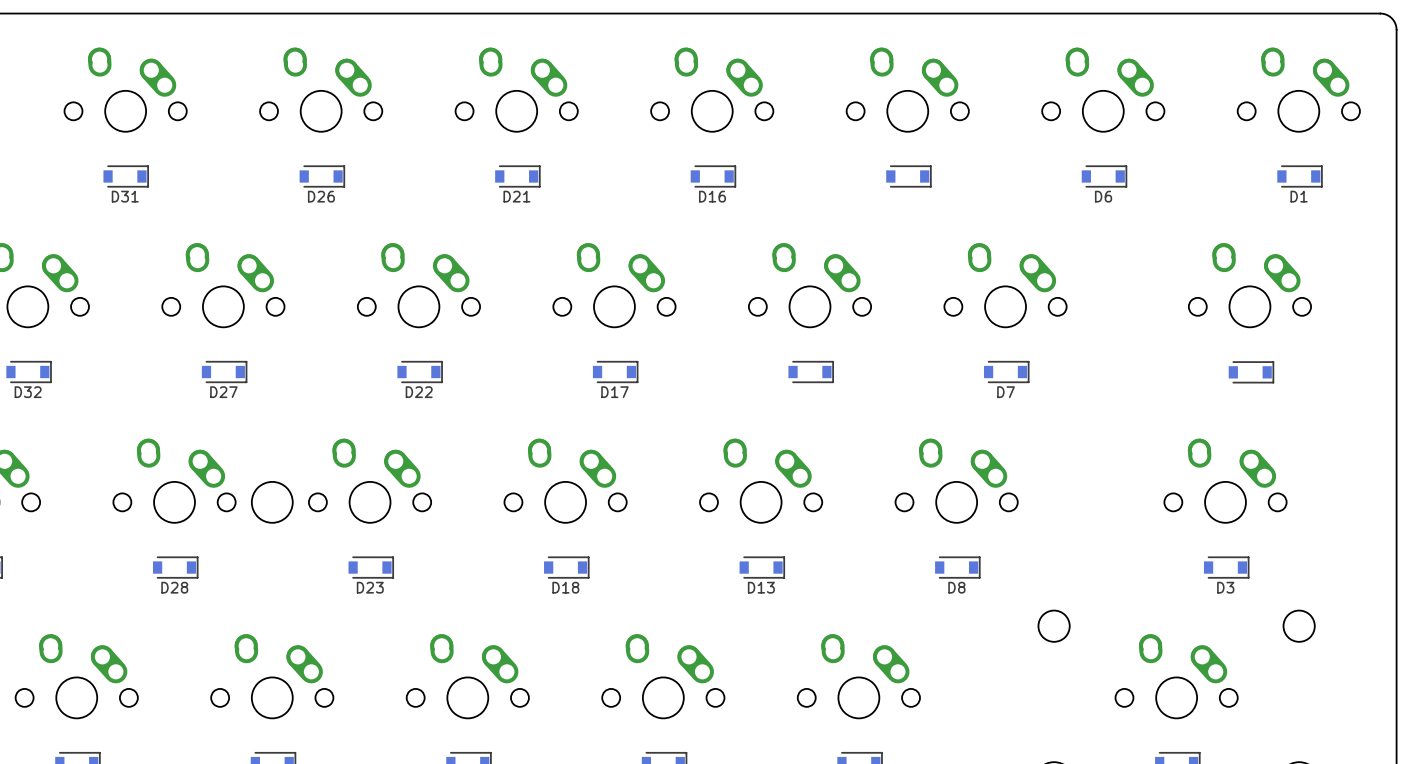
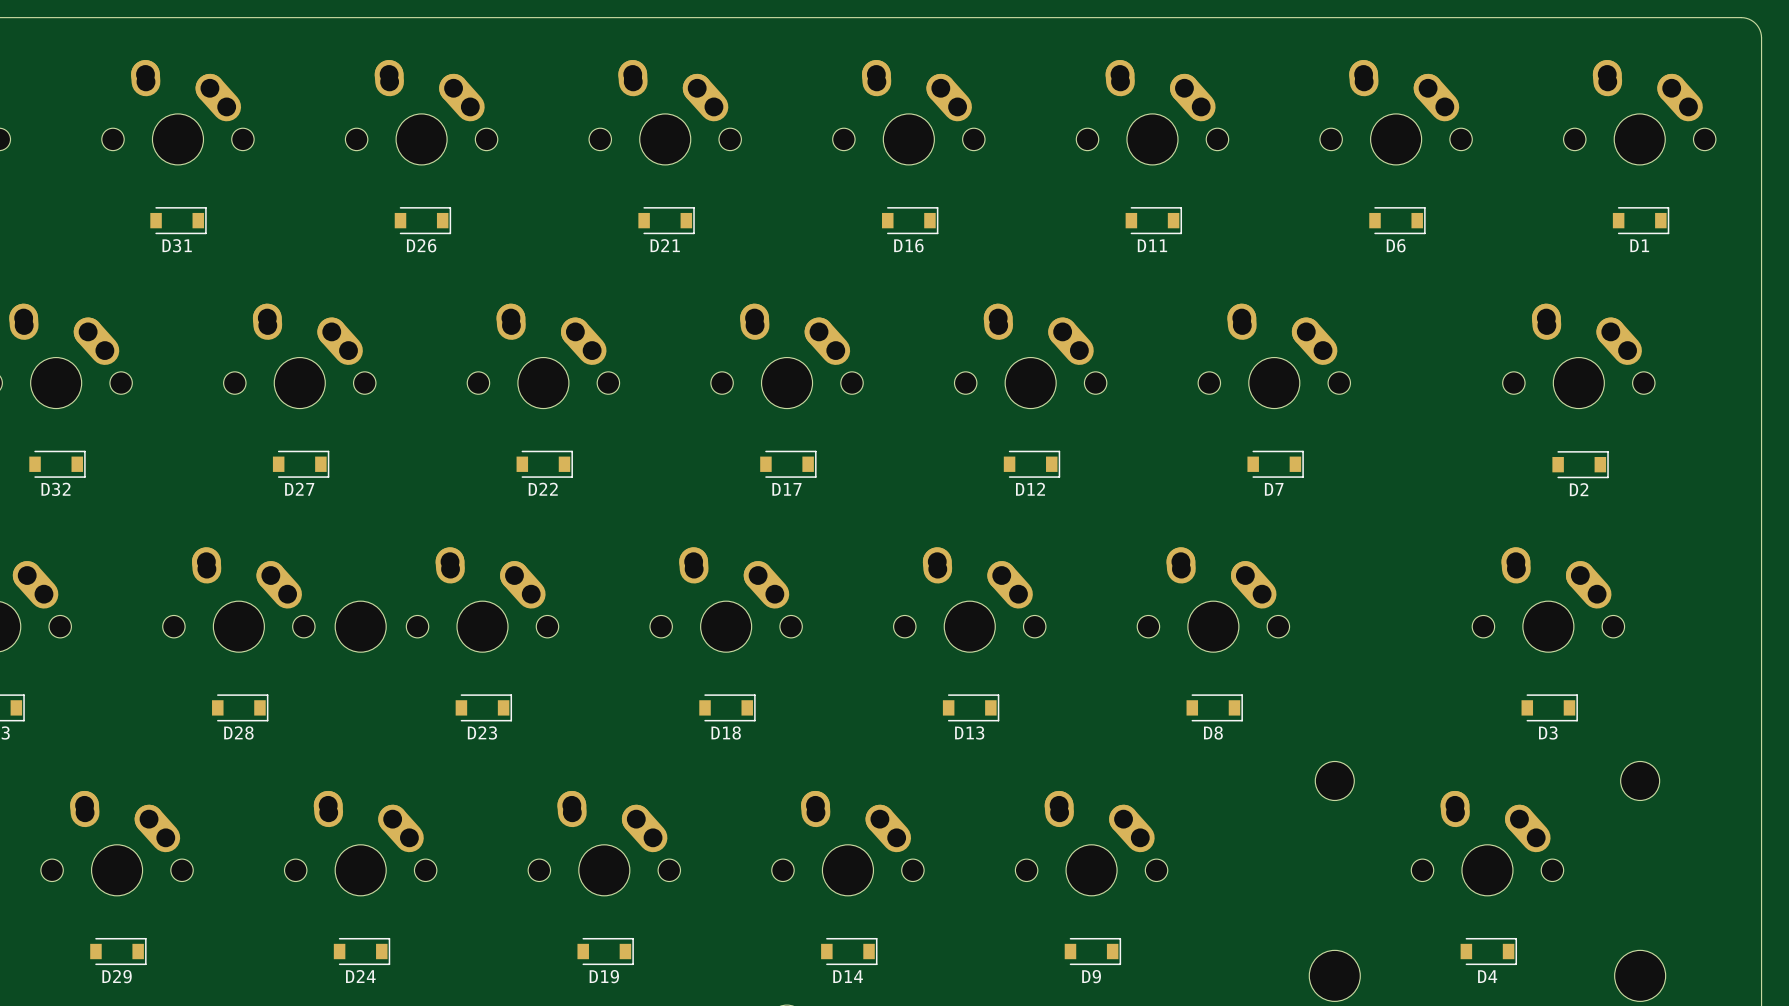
D11 name: none -> D11 (1152, 245)
D12 name: none -> D12 (1030, 489)
D2 name: none -> D2 (1579, 489)

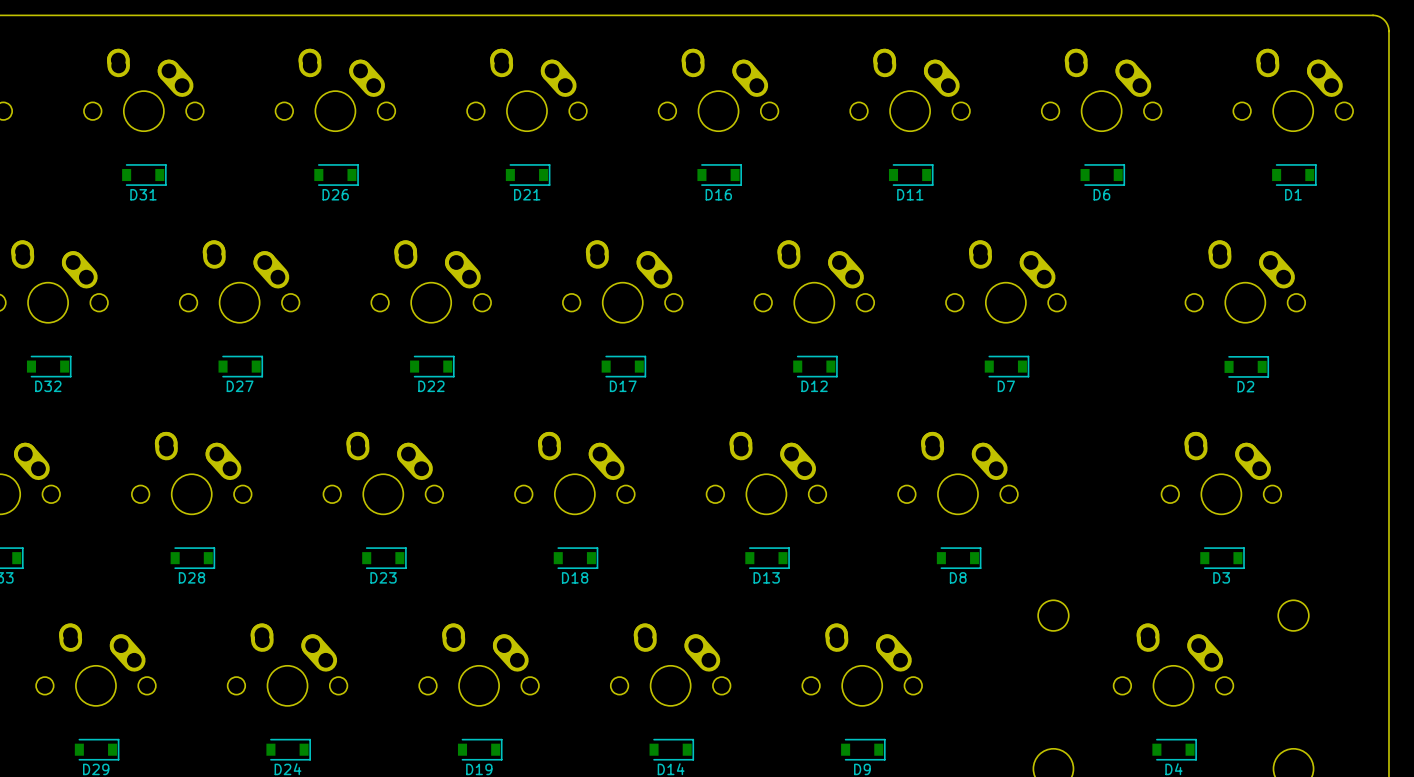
part: (360, 626) -> none

